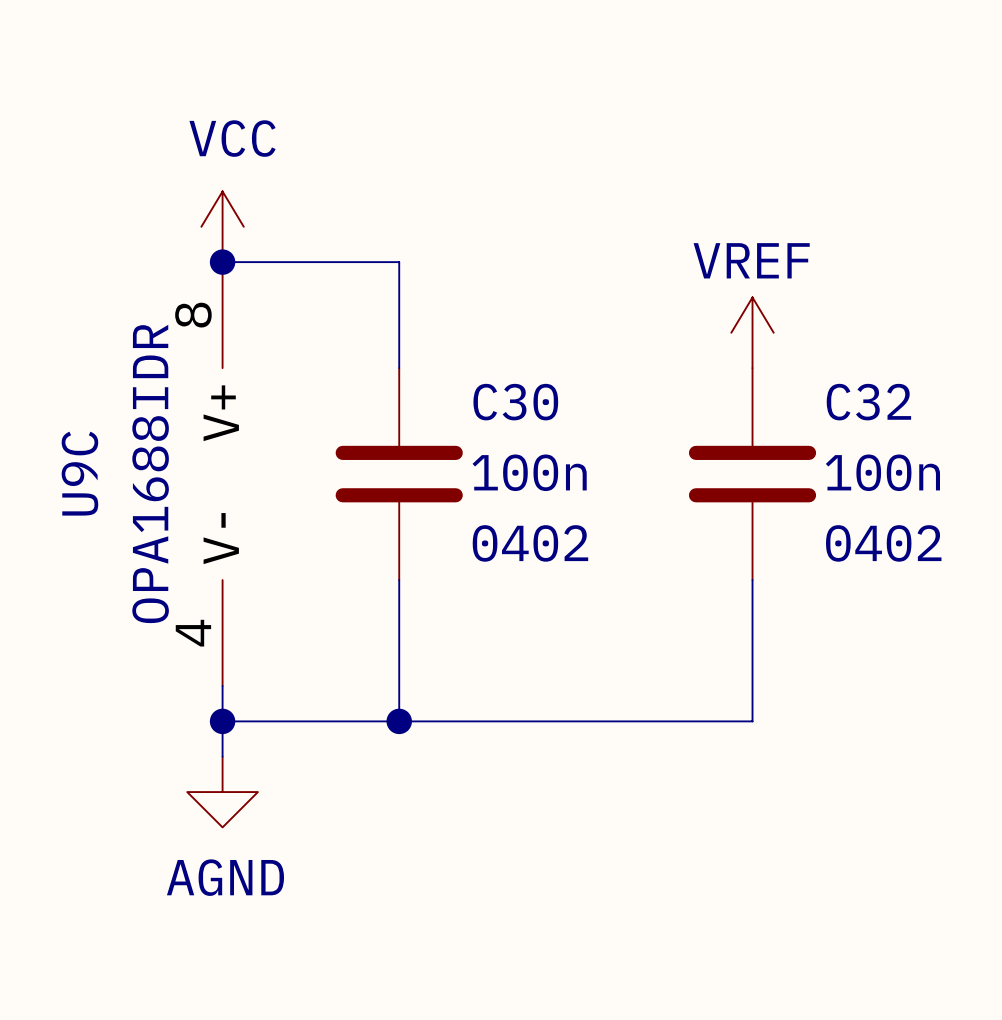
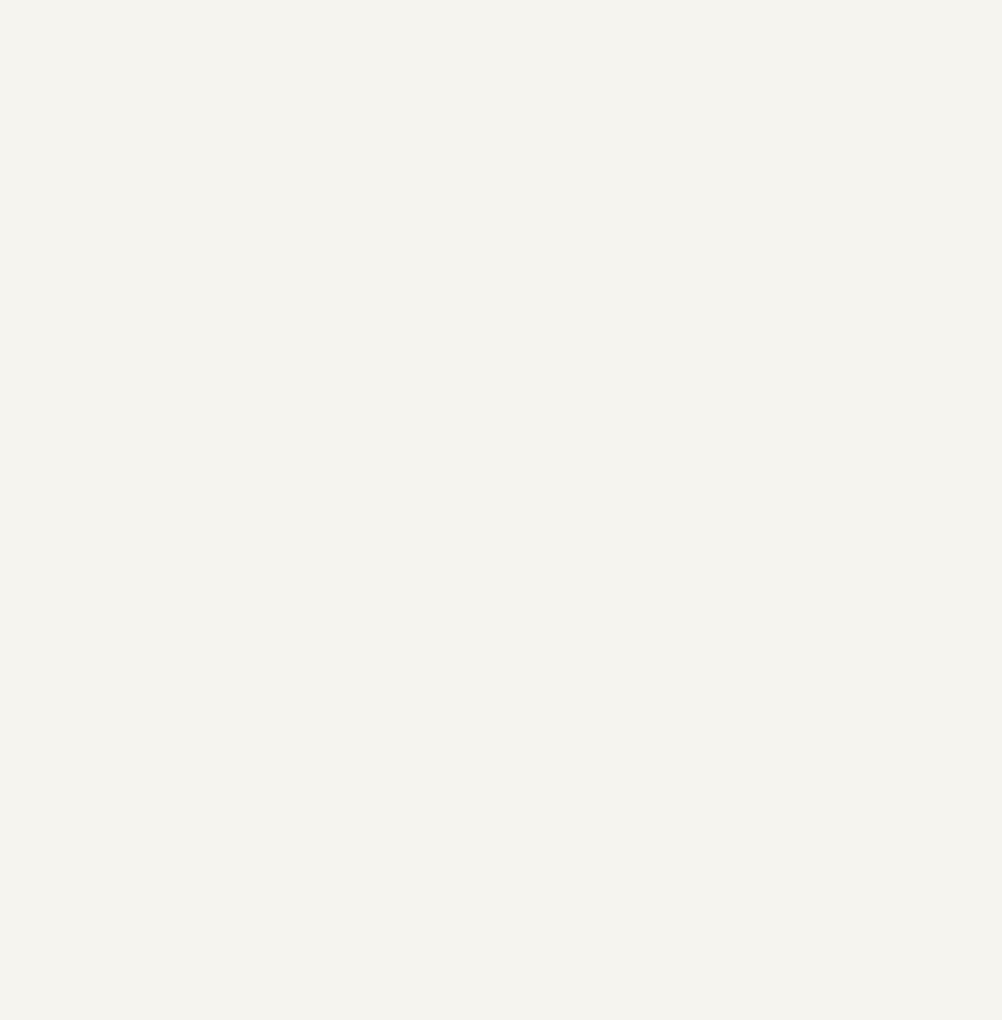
power symbol: VCC (222, 226) -> none
wire: (222, 262) (399, 262) (399, 368) -> none
junction: (222, 262) -> none
power symbol: VREF (752, 332) -> none
U9C: (222, 474) -> none
C30: (399, 474) -> none
C32: (752, 474) -> none
wire: (399, 580) (399, 721) -> none
wire: (752, 580) (752, 721) (222, 721) -> none
wire: (222, 686) (222, 756) -> none
junction: (222, 721) -> none
junction: (399, 721) -> none
power symbol: AGND (222, 792) -> none

